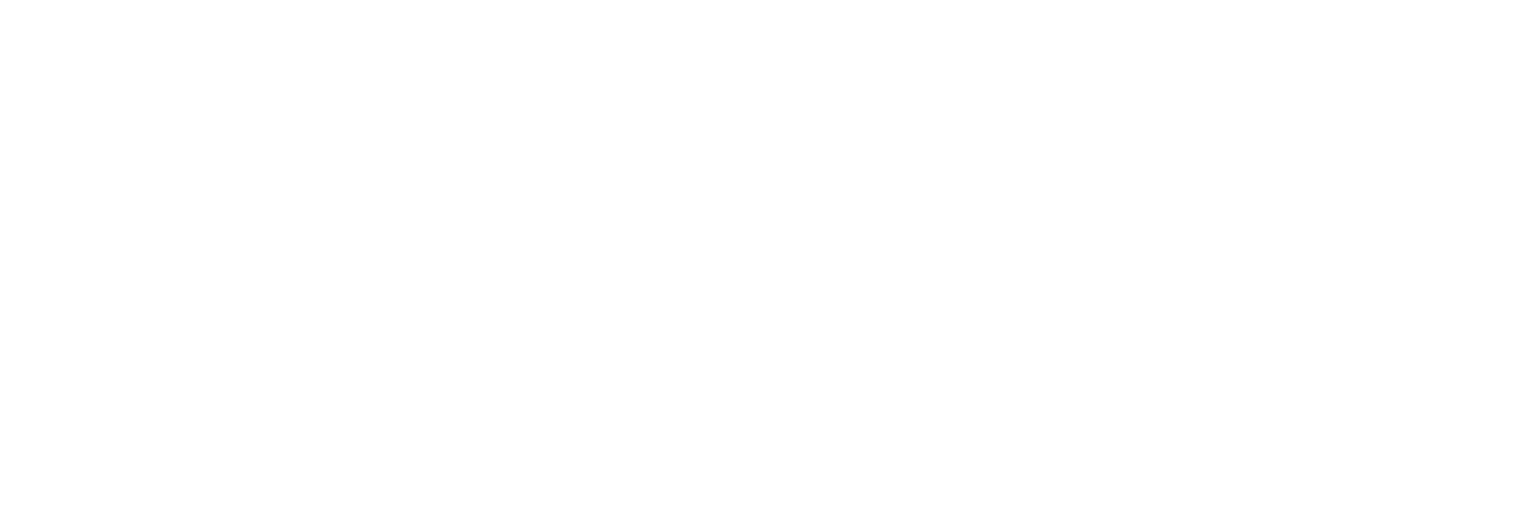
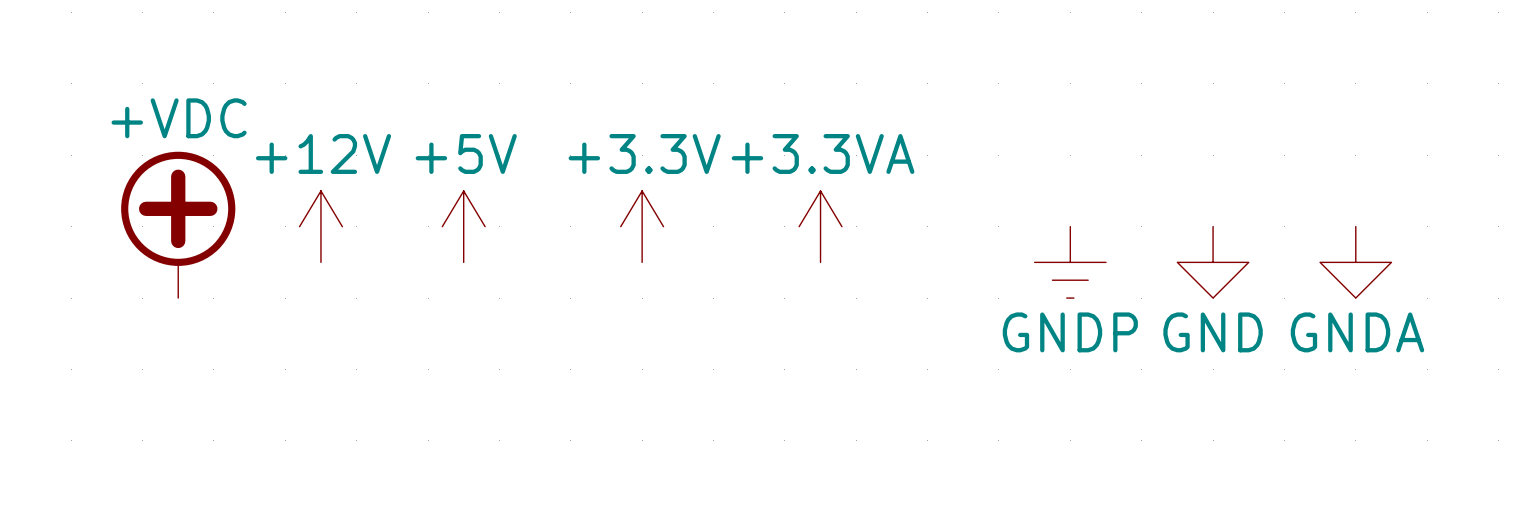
power symbol: none -> +VDC (178, 224)
power symbol: none -> +12V (320, 226)
power symbol: none -> +5V (463, 226)
power symbol: none -> +3.3V (642, 226)
power symbol: none -> +3.3VA (820, 226)
power symbol: none -> GNDP (1070, 262)
power symbol: none -> GND (1213, 262)
power symbol: none -> GNDA (1355, 262)

